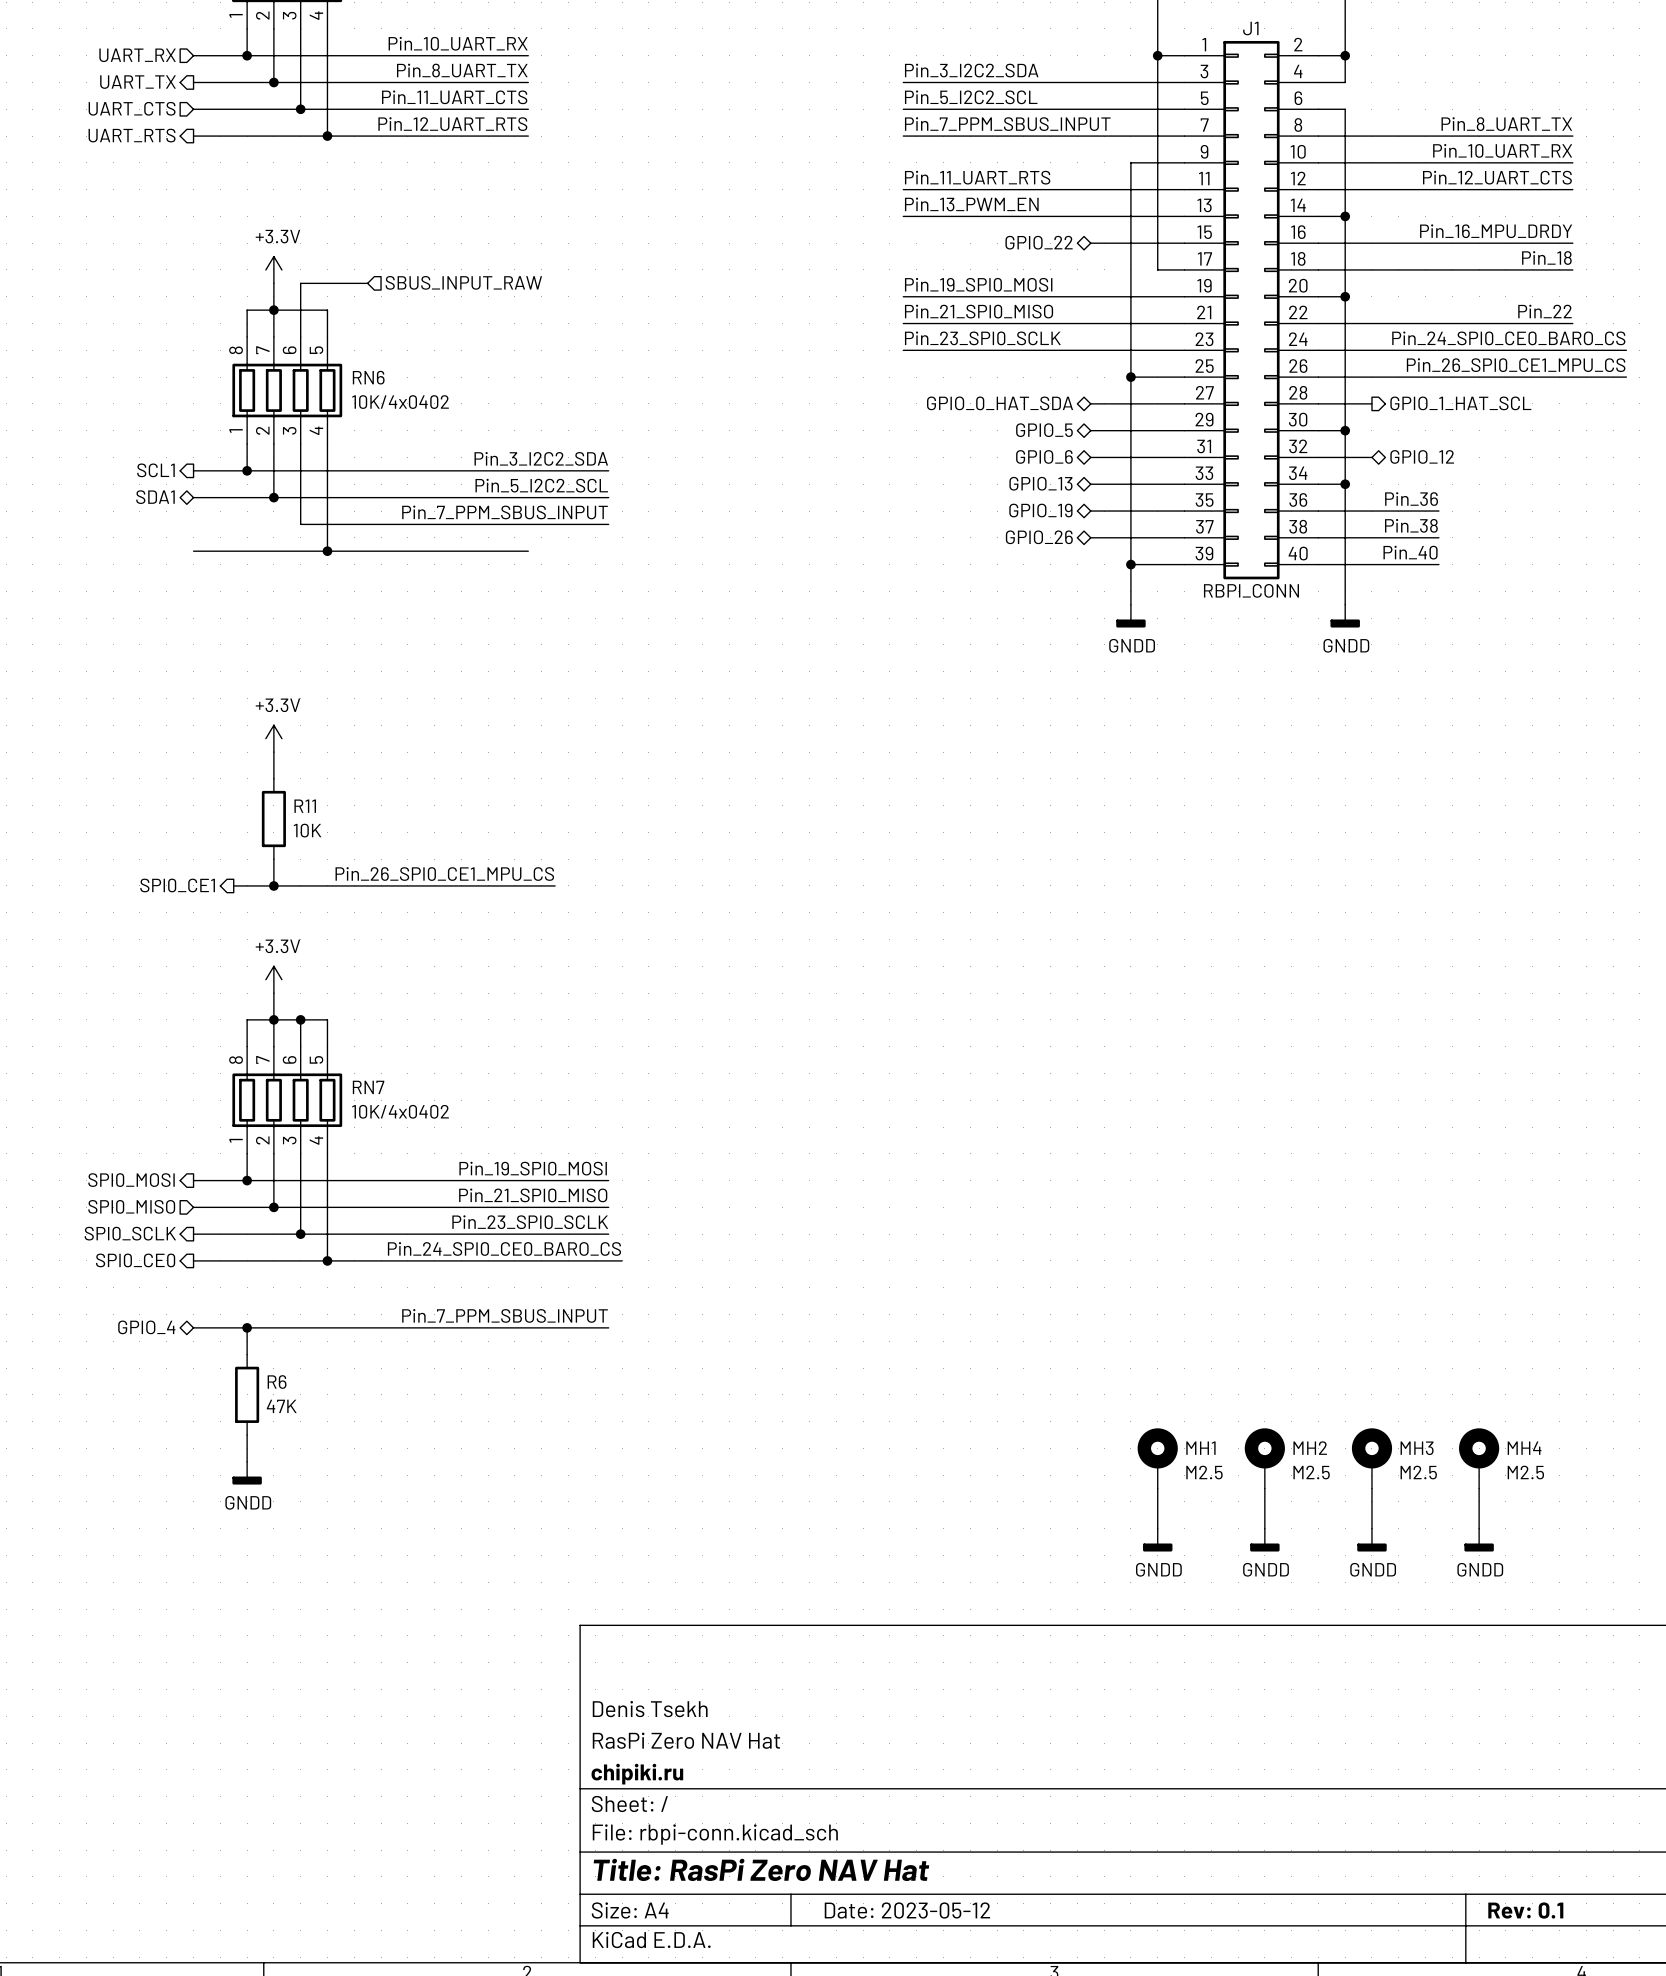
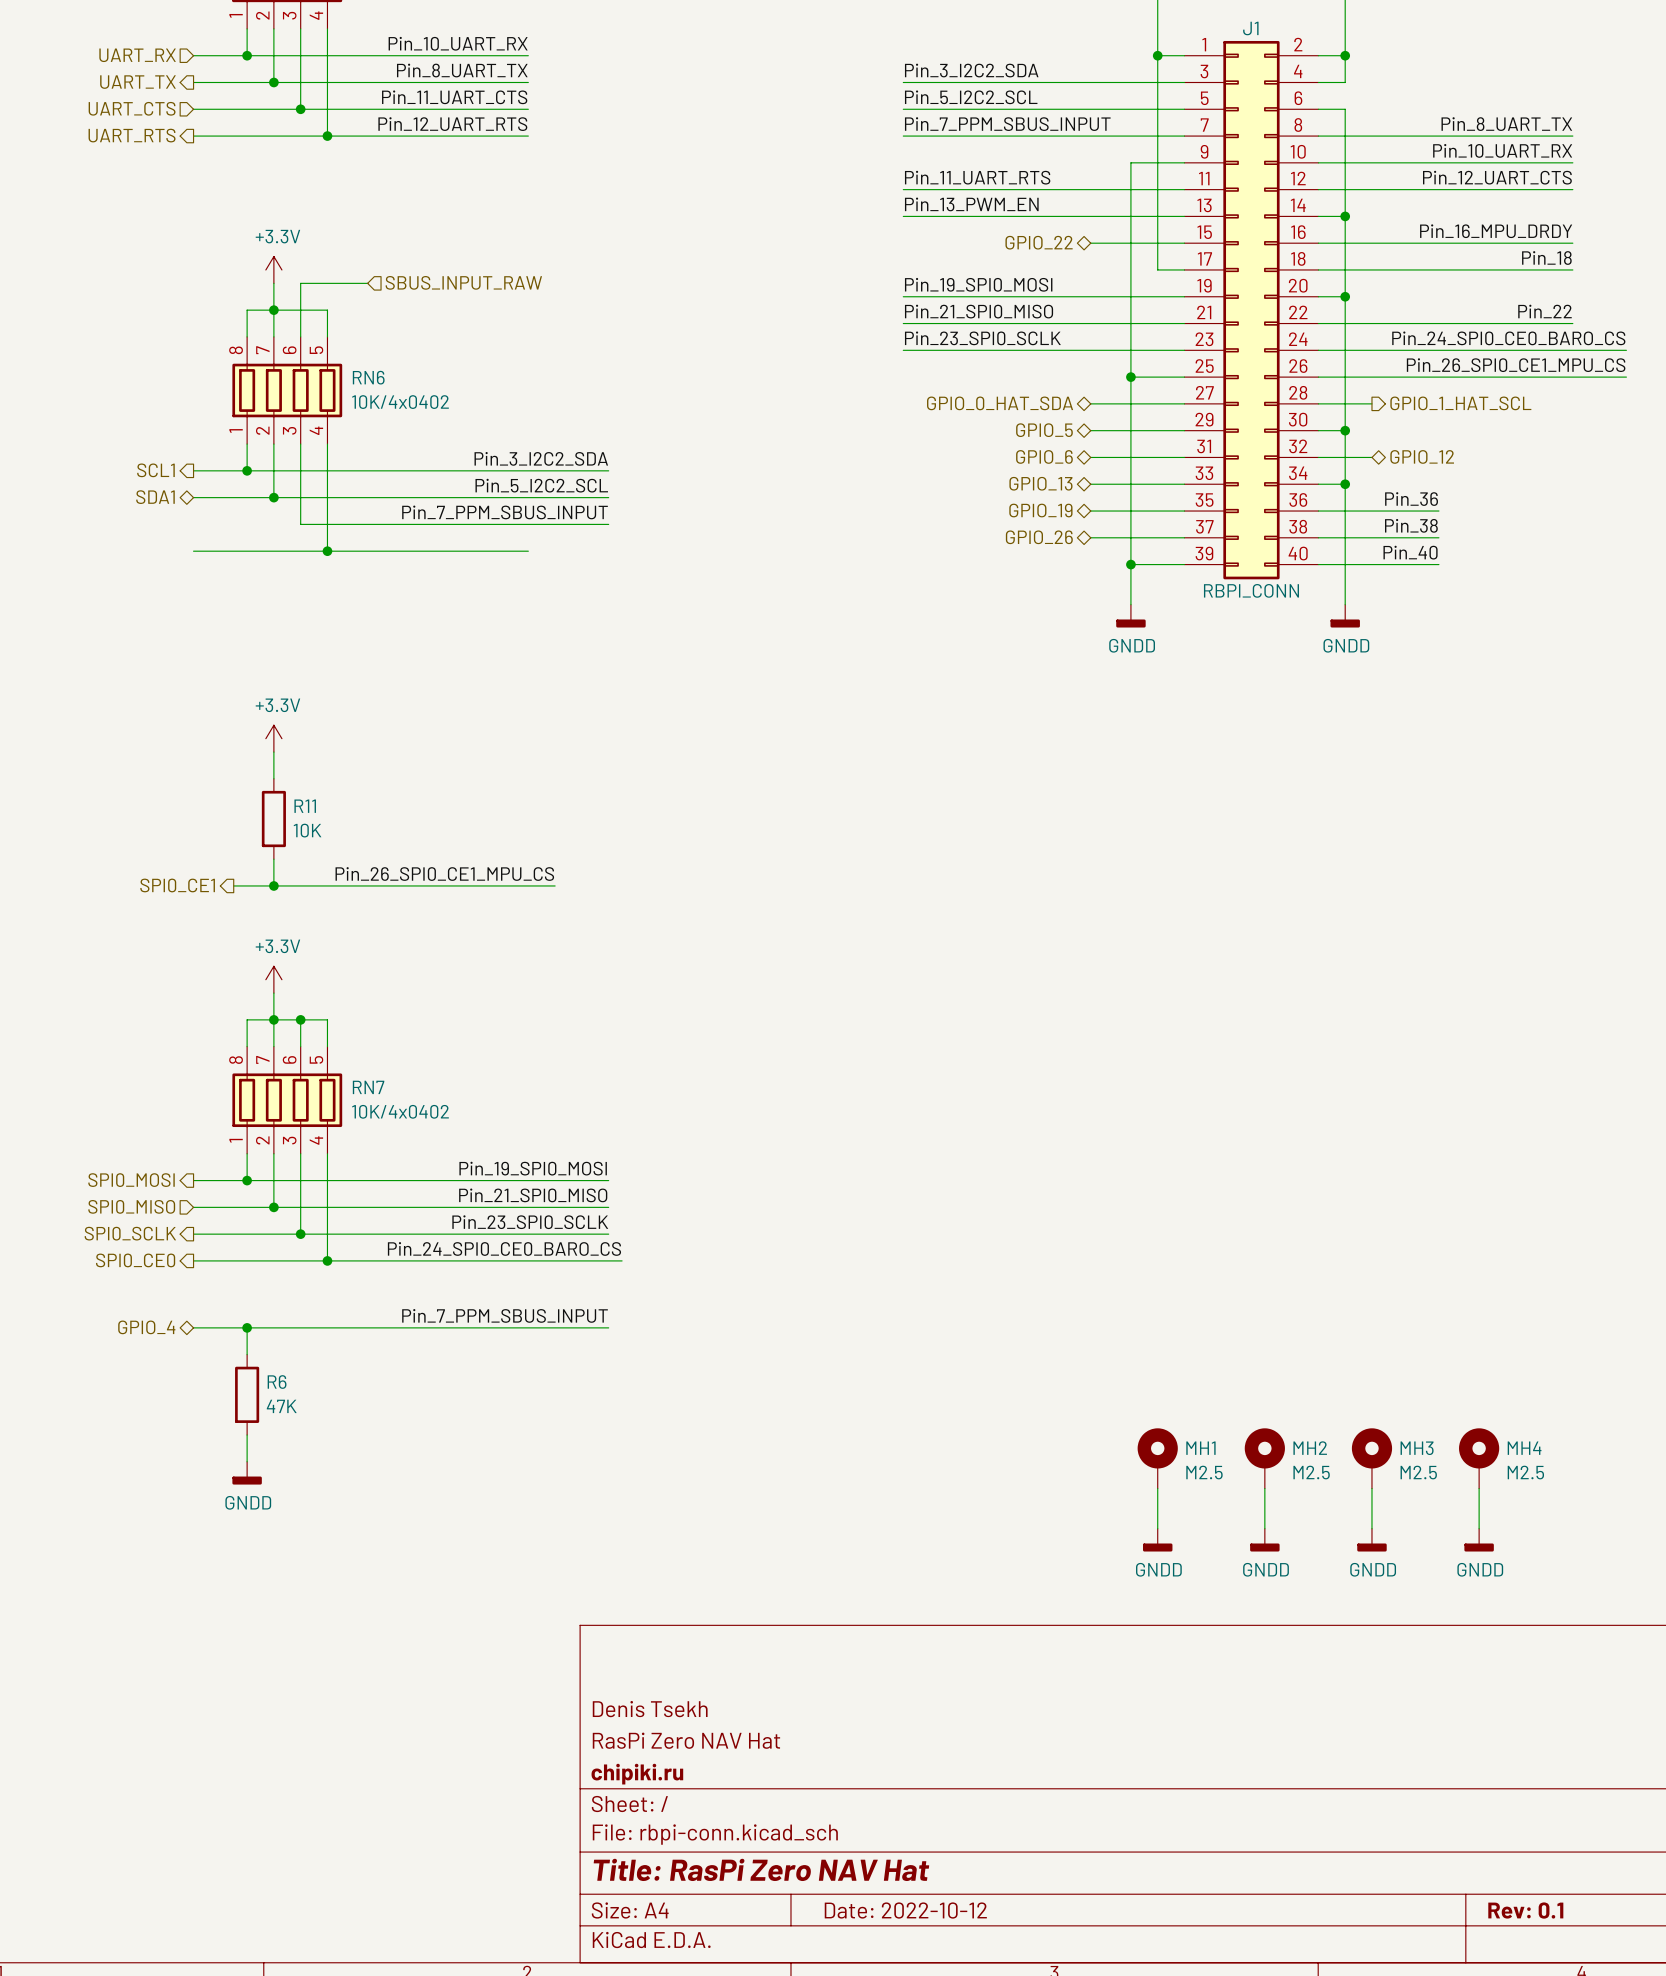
title block: Date: 2023-05-12 (907, 1910) -> Date: 2022-10-12 (905, 1910)

